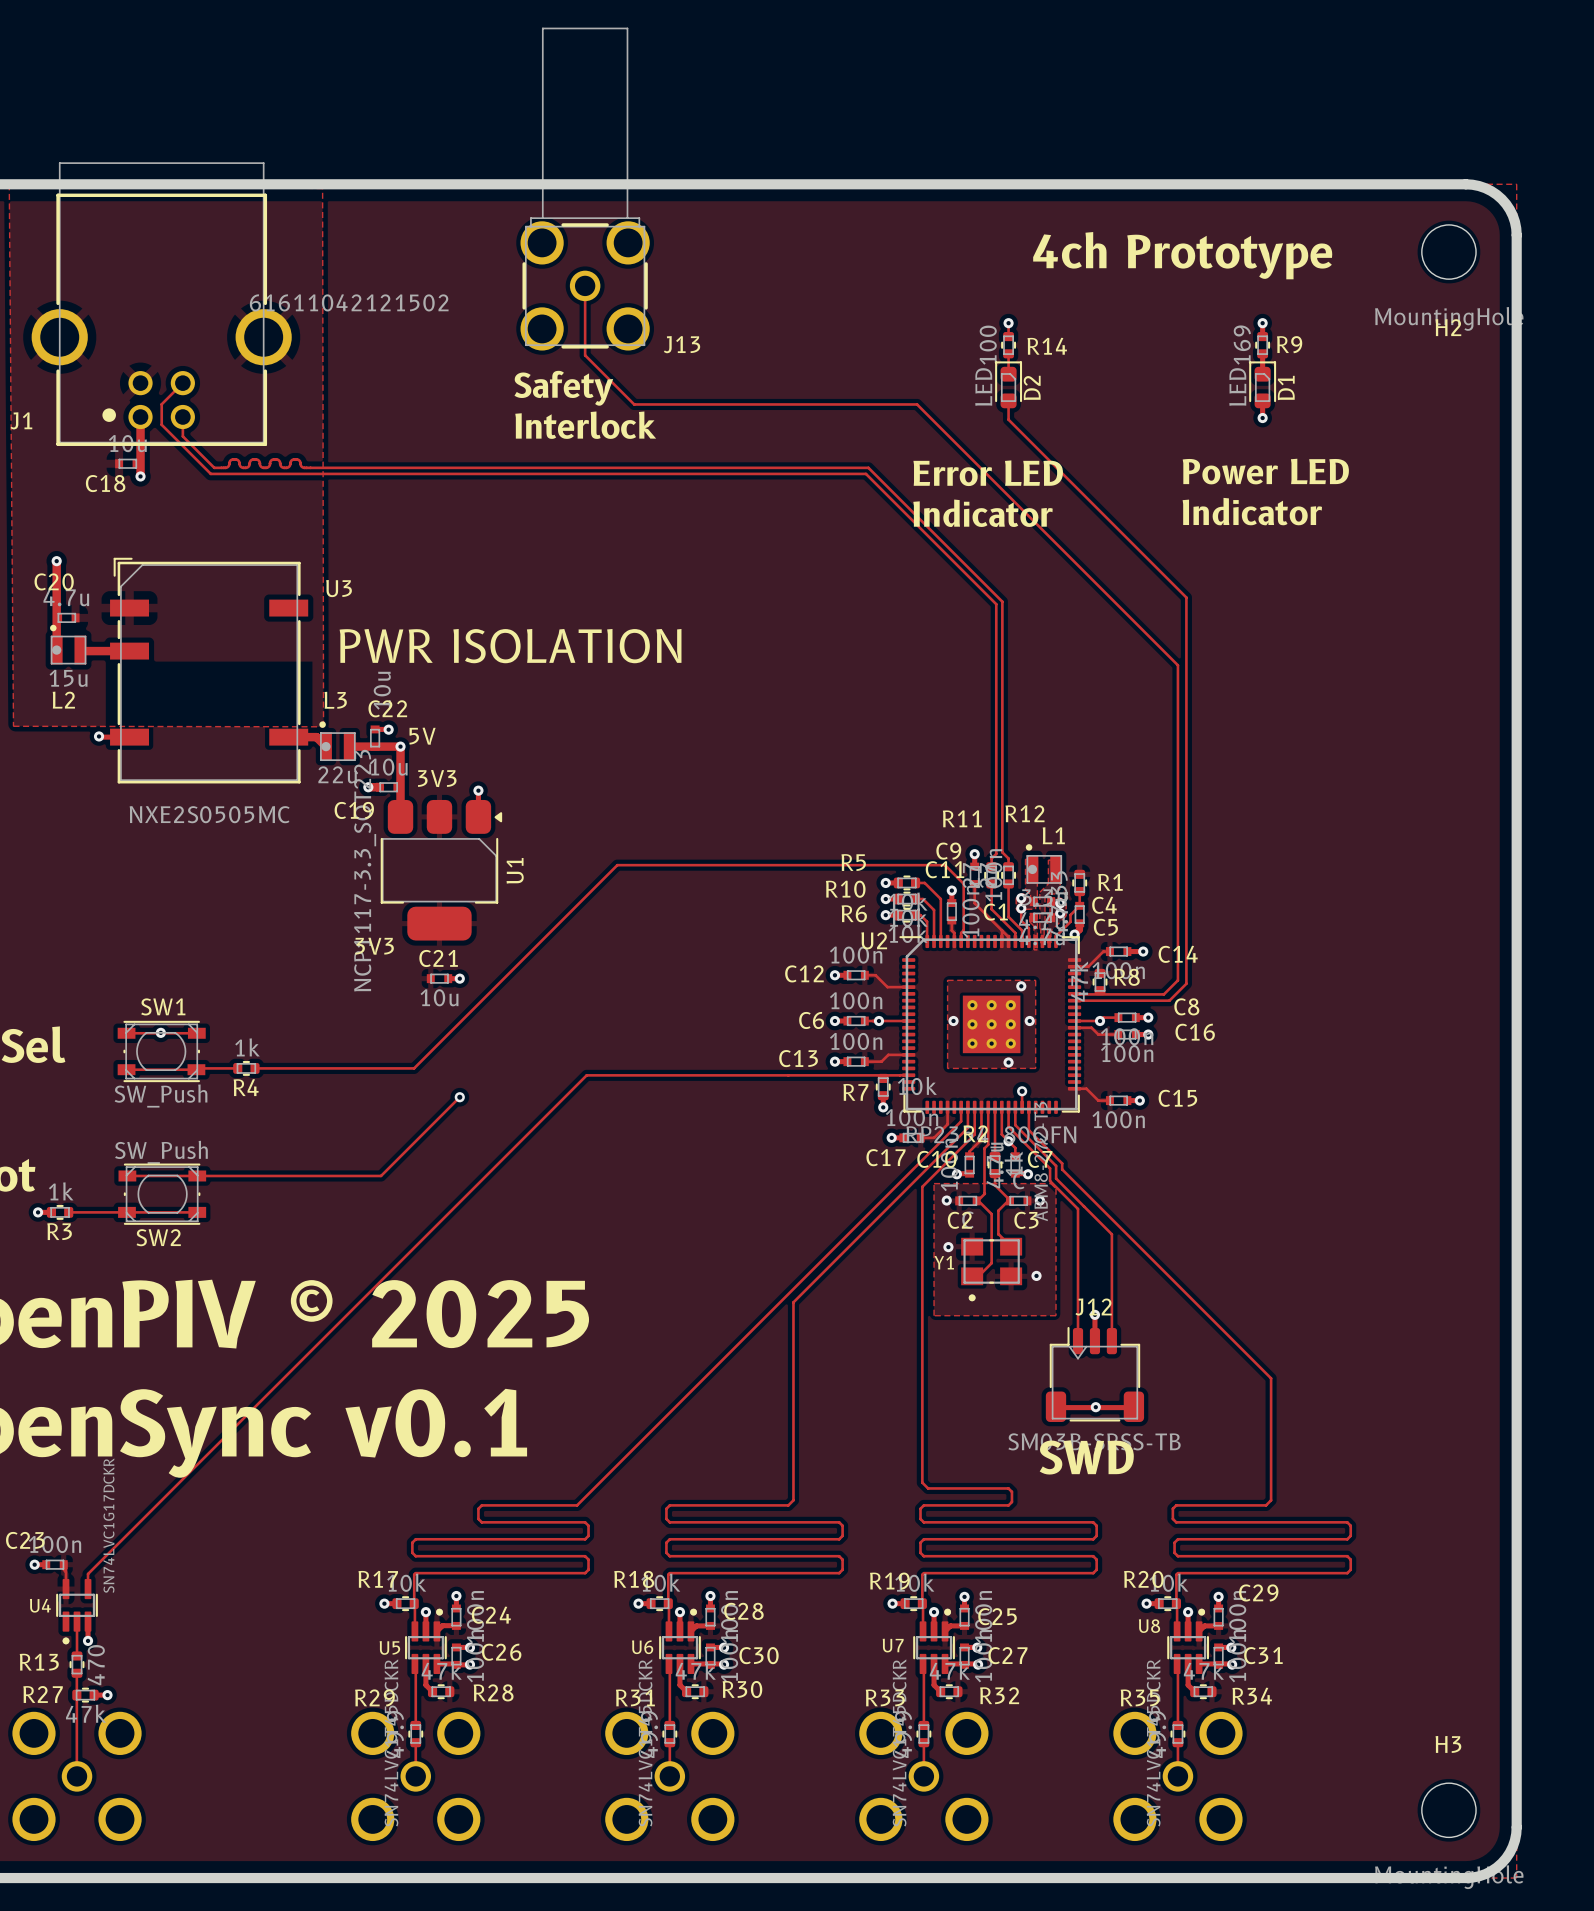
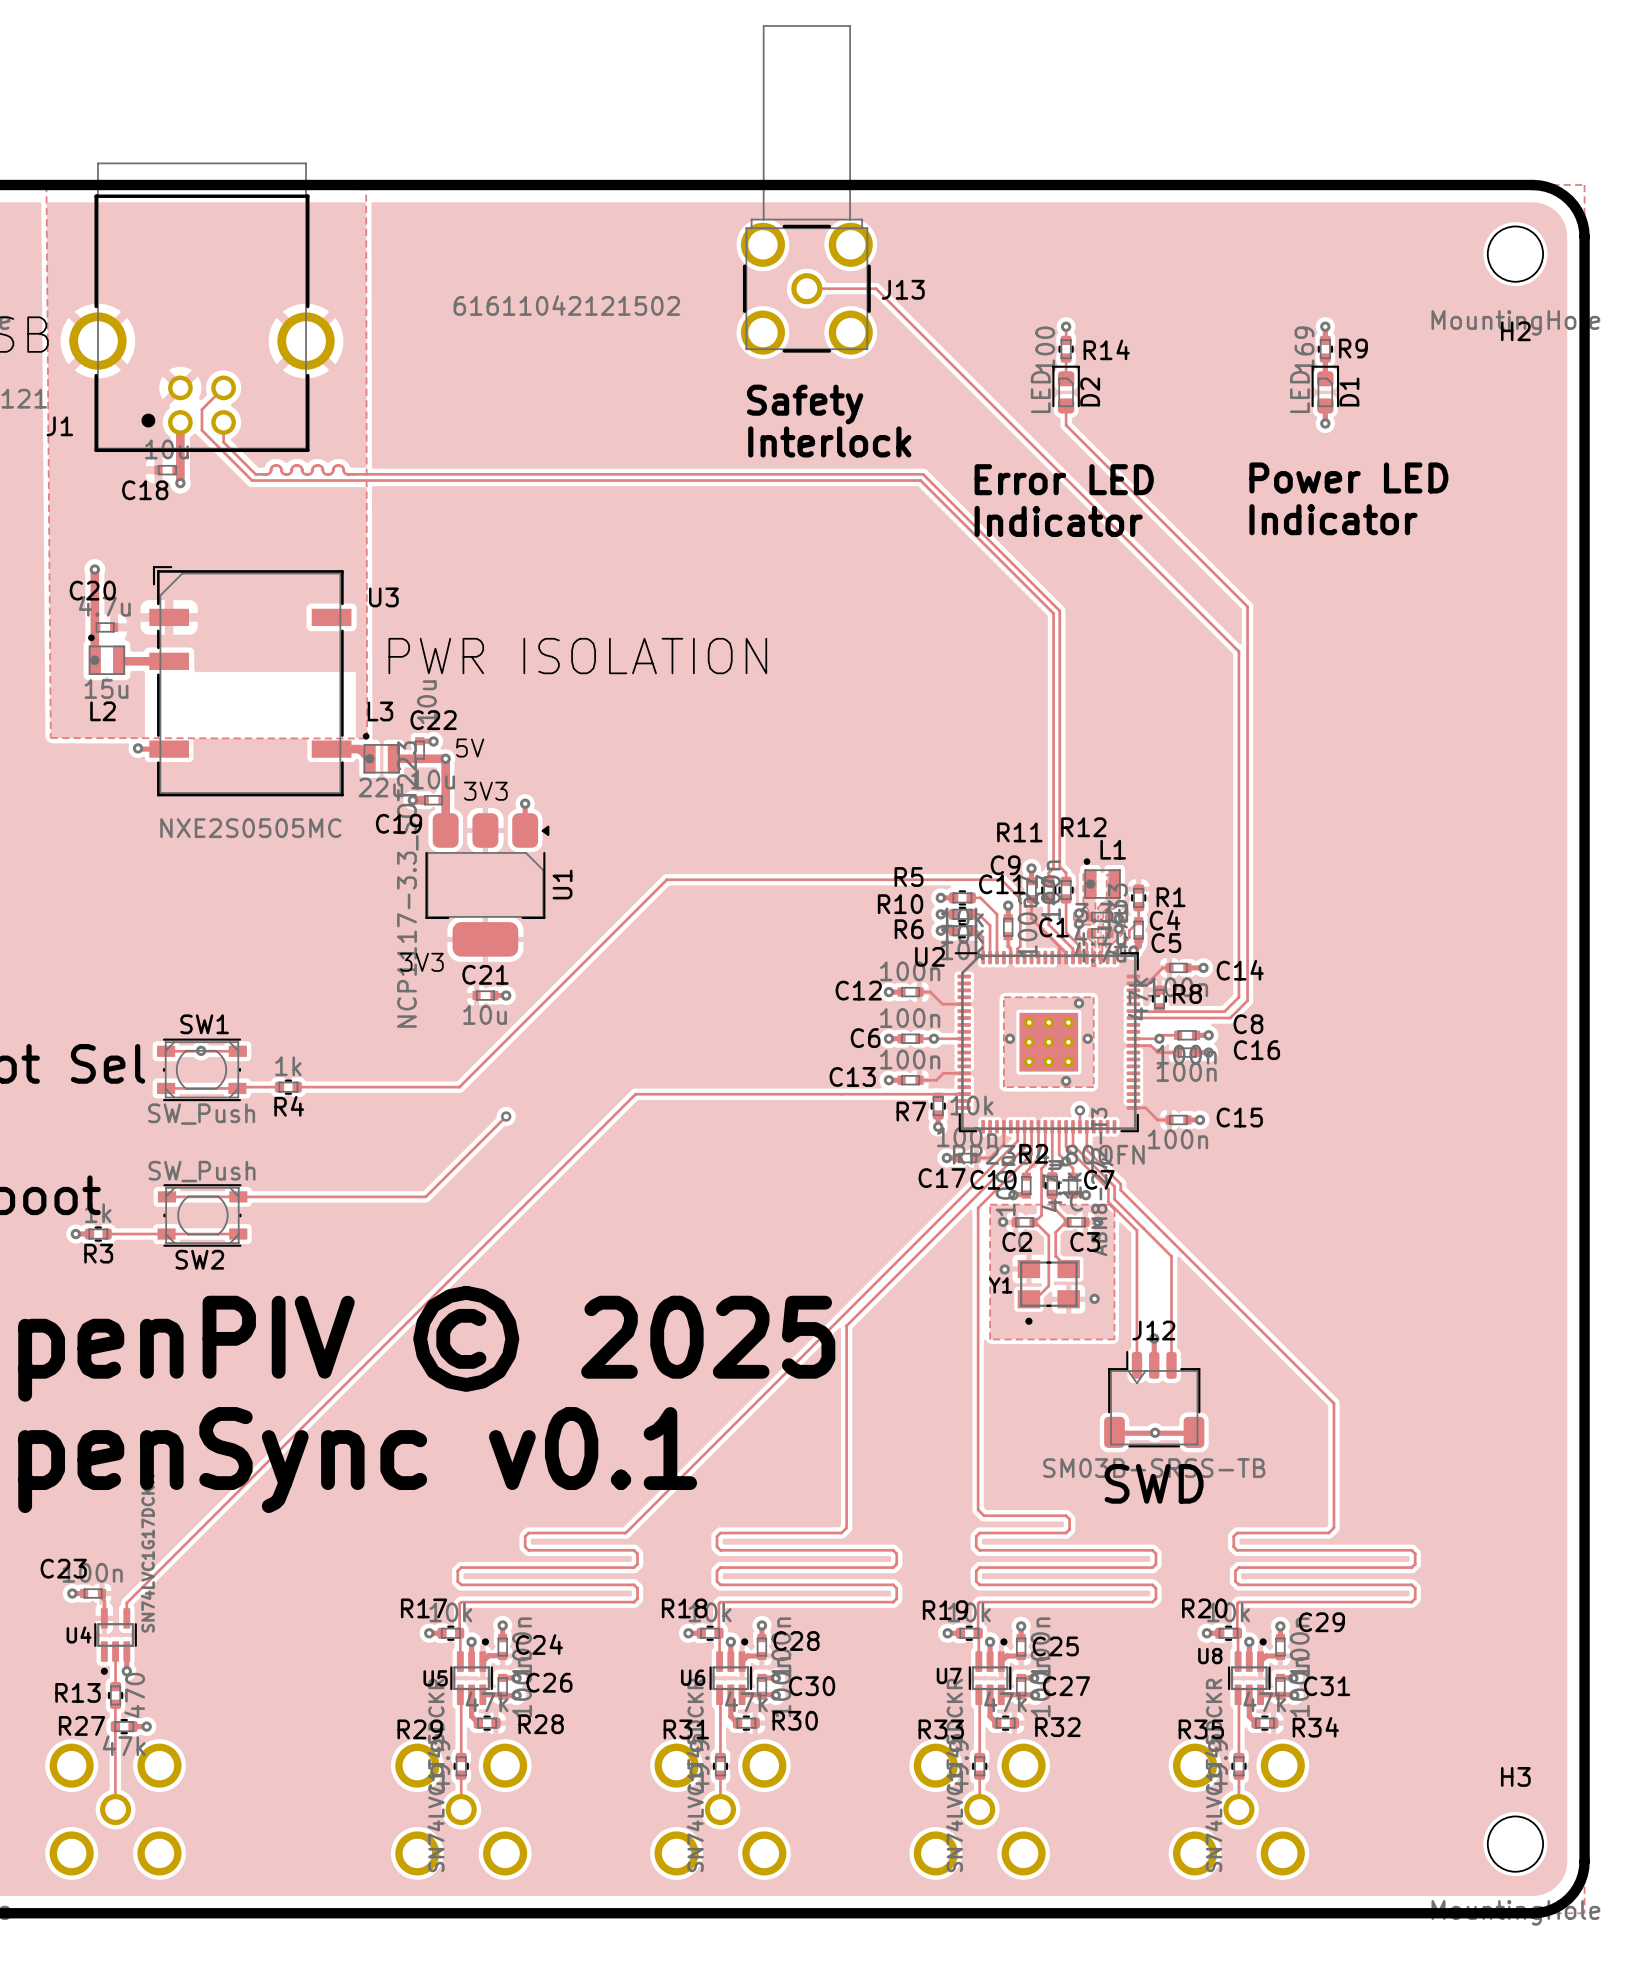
J13 position: (585, 189) -> (806, 189)
text: 4ch Prototype (1182, 255) -> none
track: (585, 285) (585, 355) (634, 404) (917, 404) (1177, 665) -> (806, 288) (875, 288) (1238, 651) (1238, 675)
J13 name position: J13 (682, 344) -> J13 (903, 289)
text position: Safety (563, 388) -> Safety (805, 404)
text position: Interlock (585, 425) -> Interlock (829, 441)

